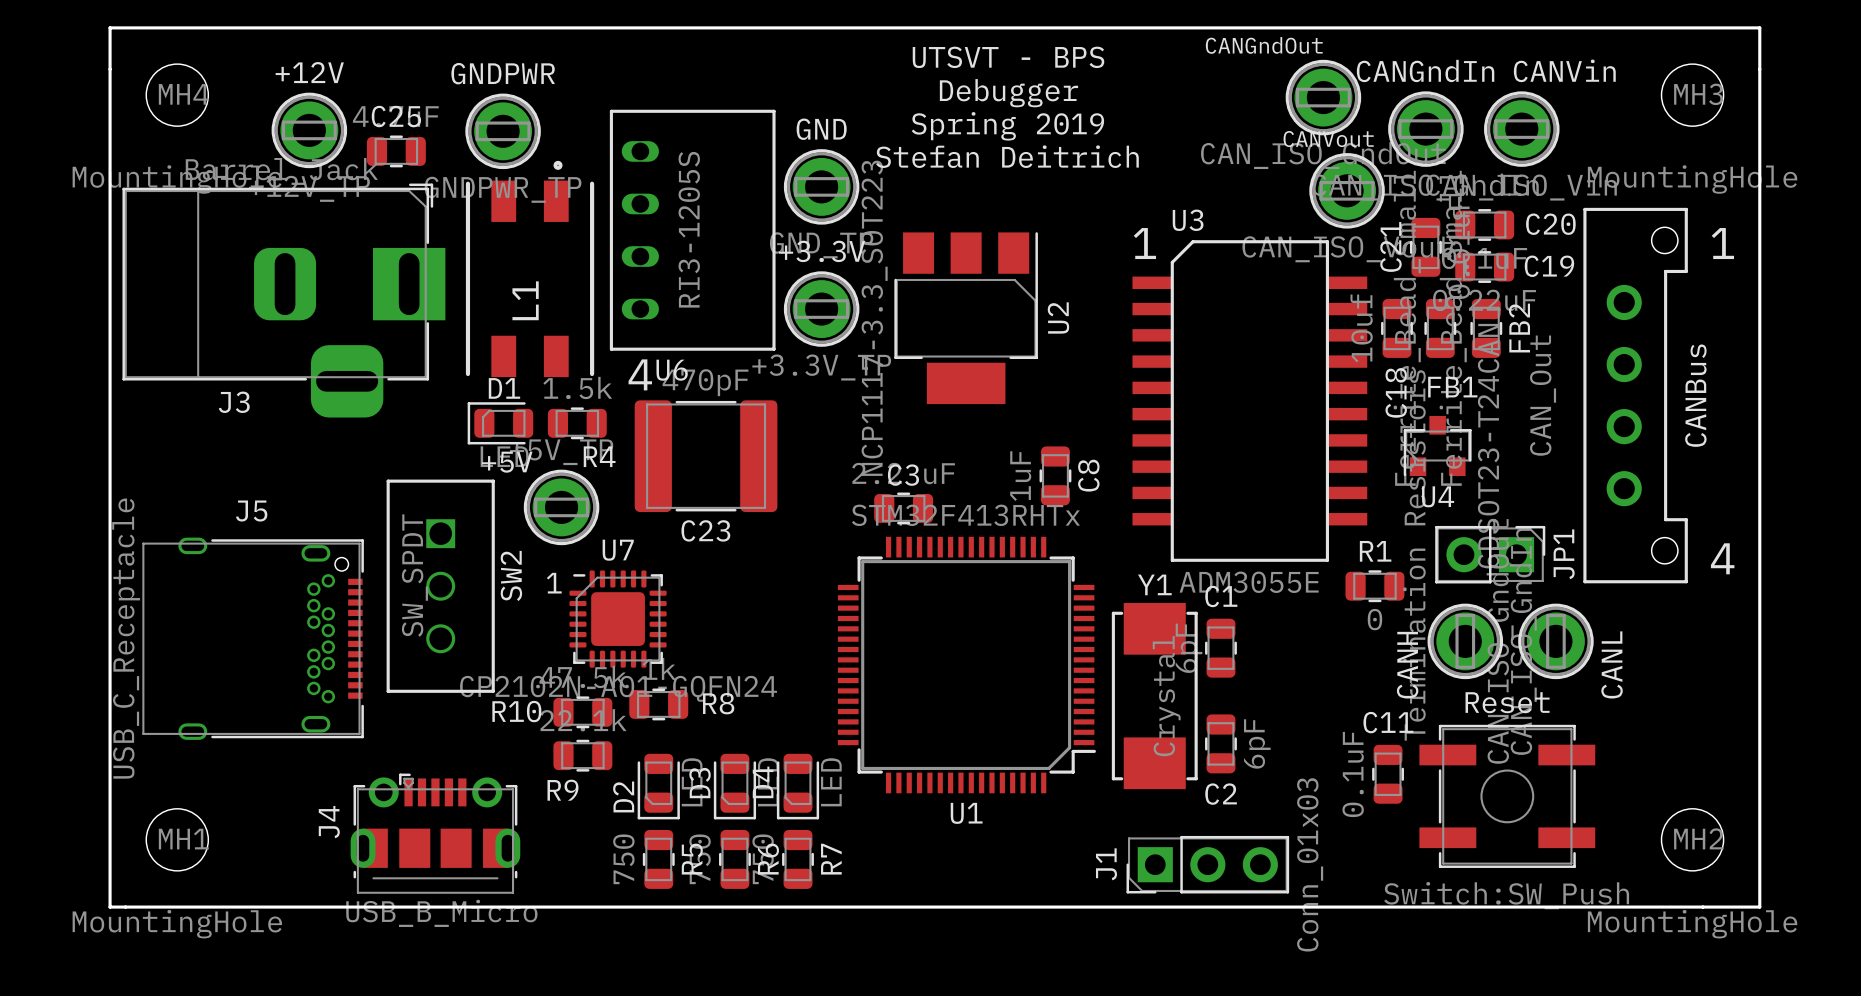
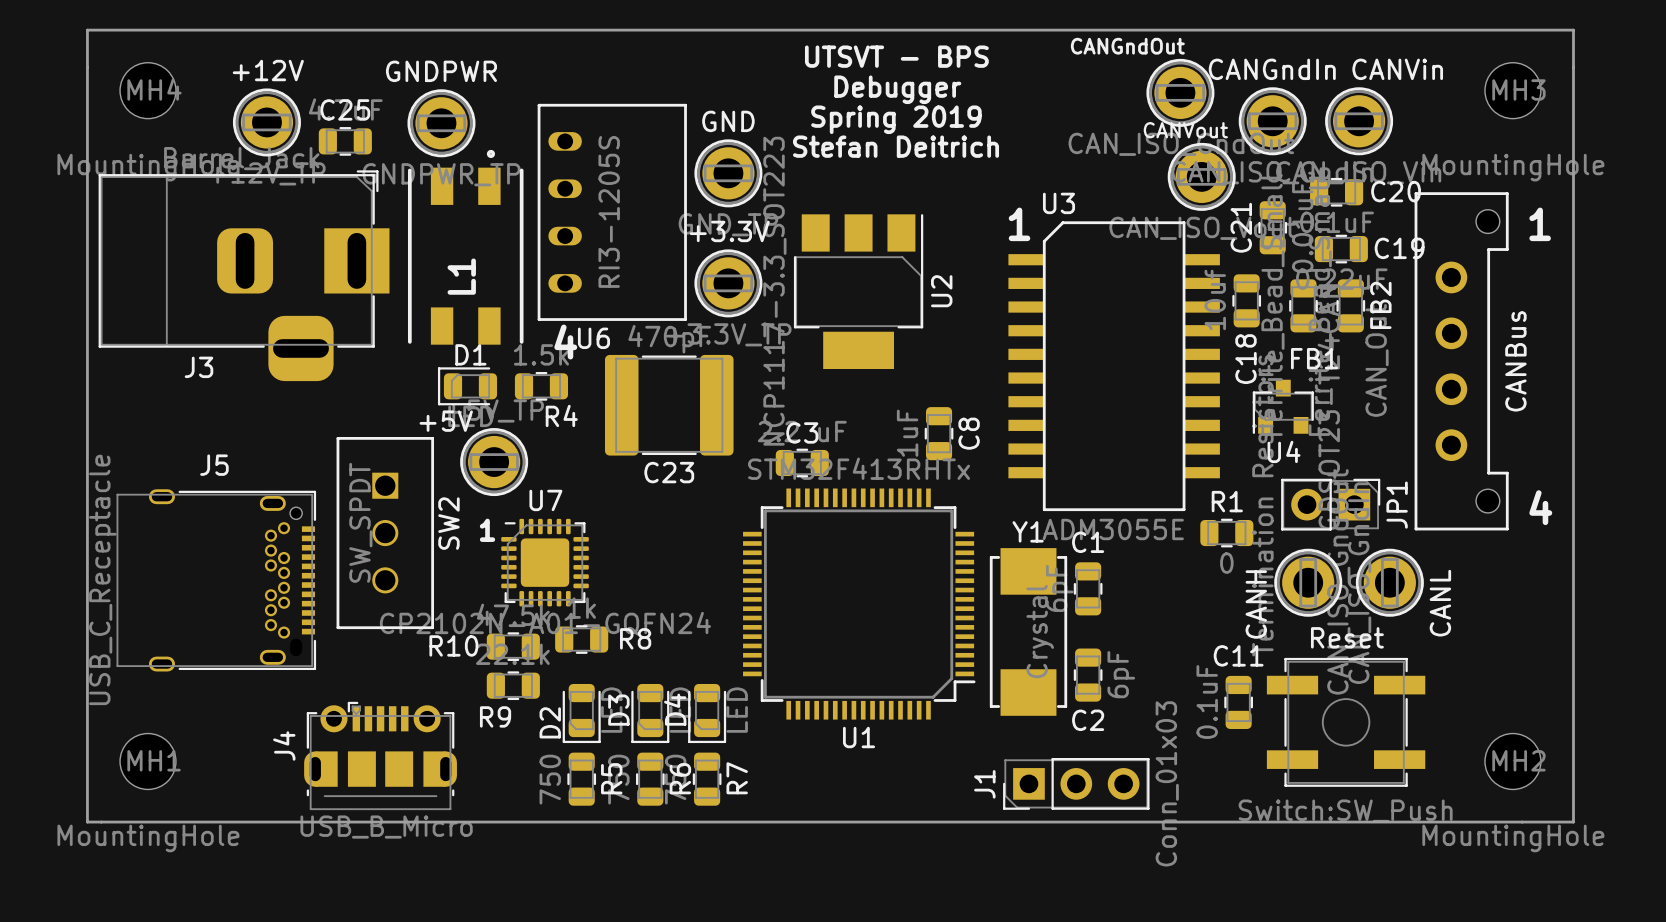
C20 position: (1484, 224) -> (1336, 192)
C19 position: (1484, 267) -> (1341, 249)
FB1 position: (1440, 328) -> (1303, 305)
FB2 position: (1486, 328) -> (1350, 305)
D1 position: (500, 423) -> (467, 386)
R4 position: (577, 423) -> (541, 386)
C23 position: (706, 456) -> (669, 405)

